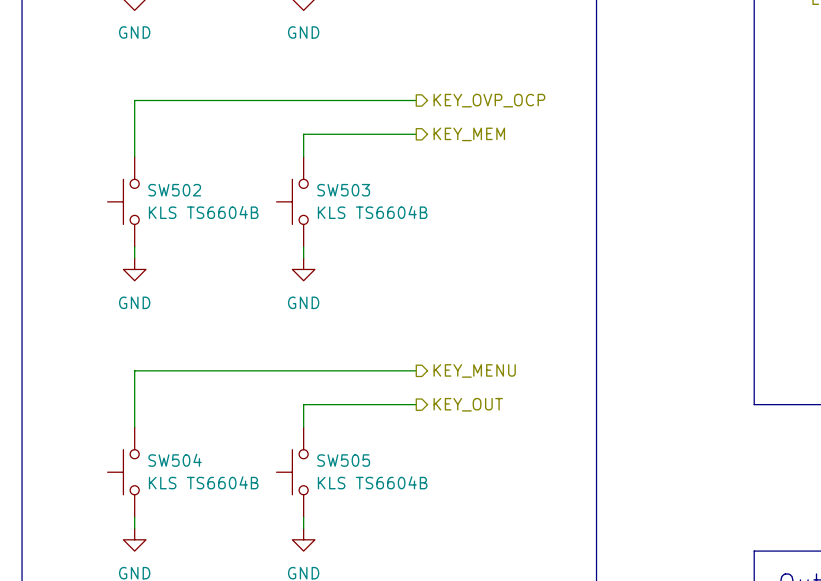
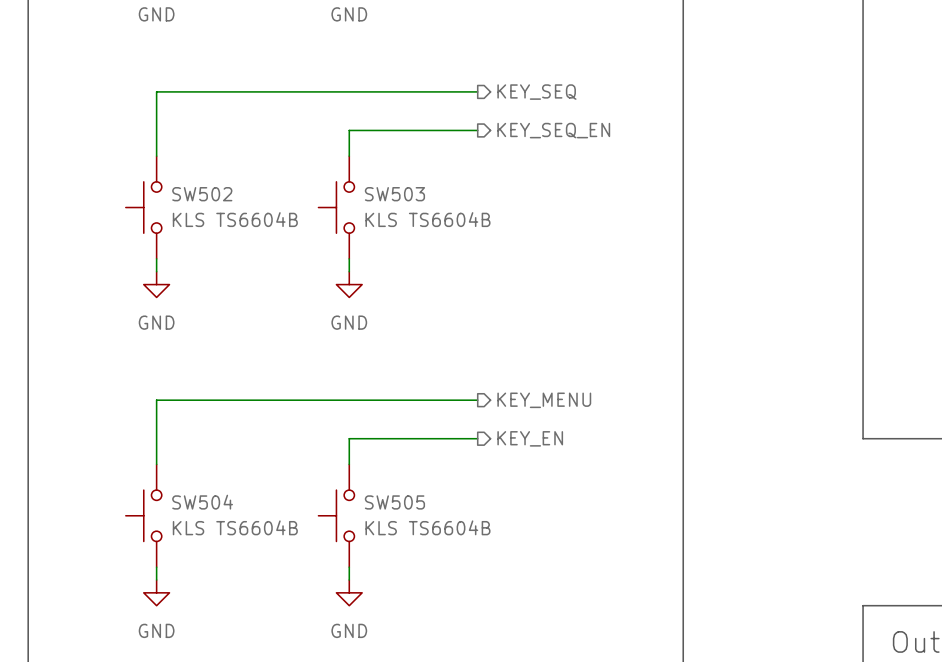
hierarchical label: KEY_OVP_OCP (489, 100) -> KEY_SEQ (536, 92)
hierarchical label: KEY_MEM (469, 134) -> KEY_SEQ_EN (553, 130)
hierarchical label: KEY_OUT (468, 404) -> KEY_EN (530, 438)

